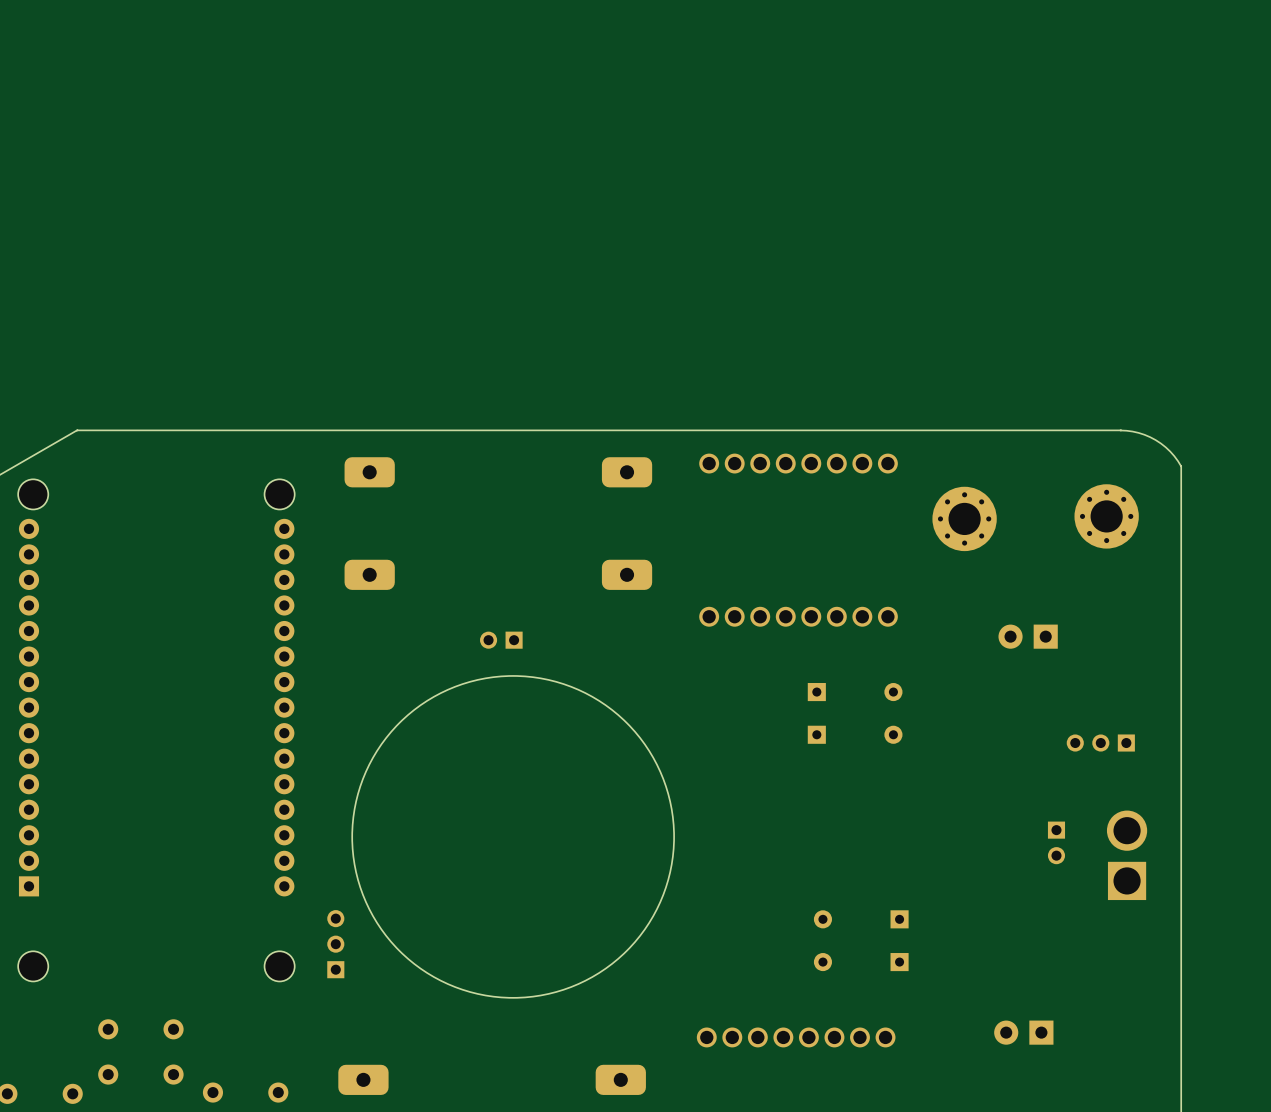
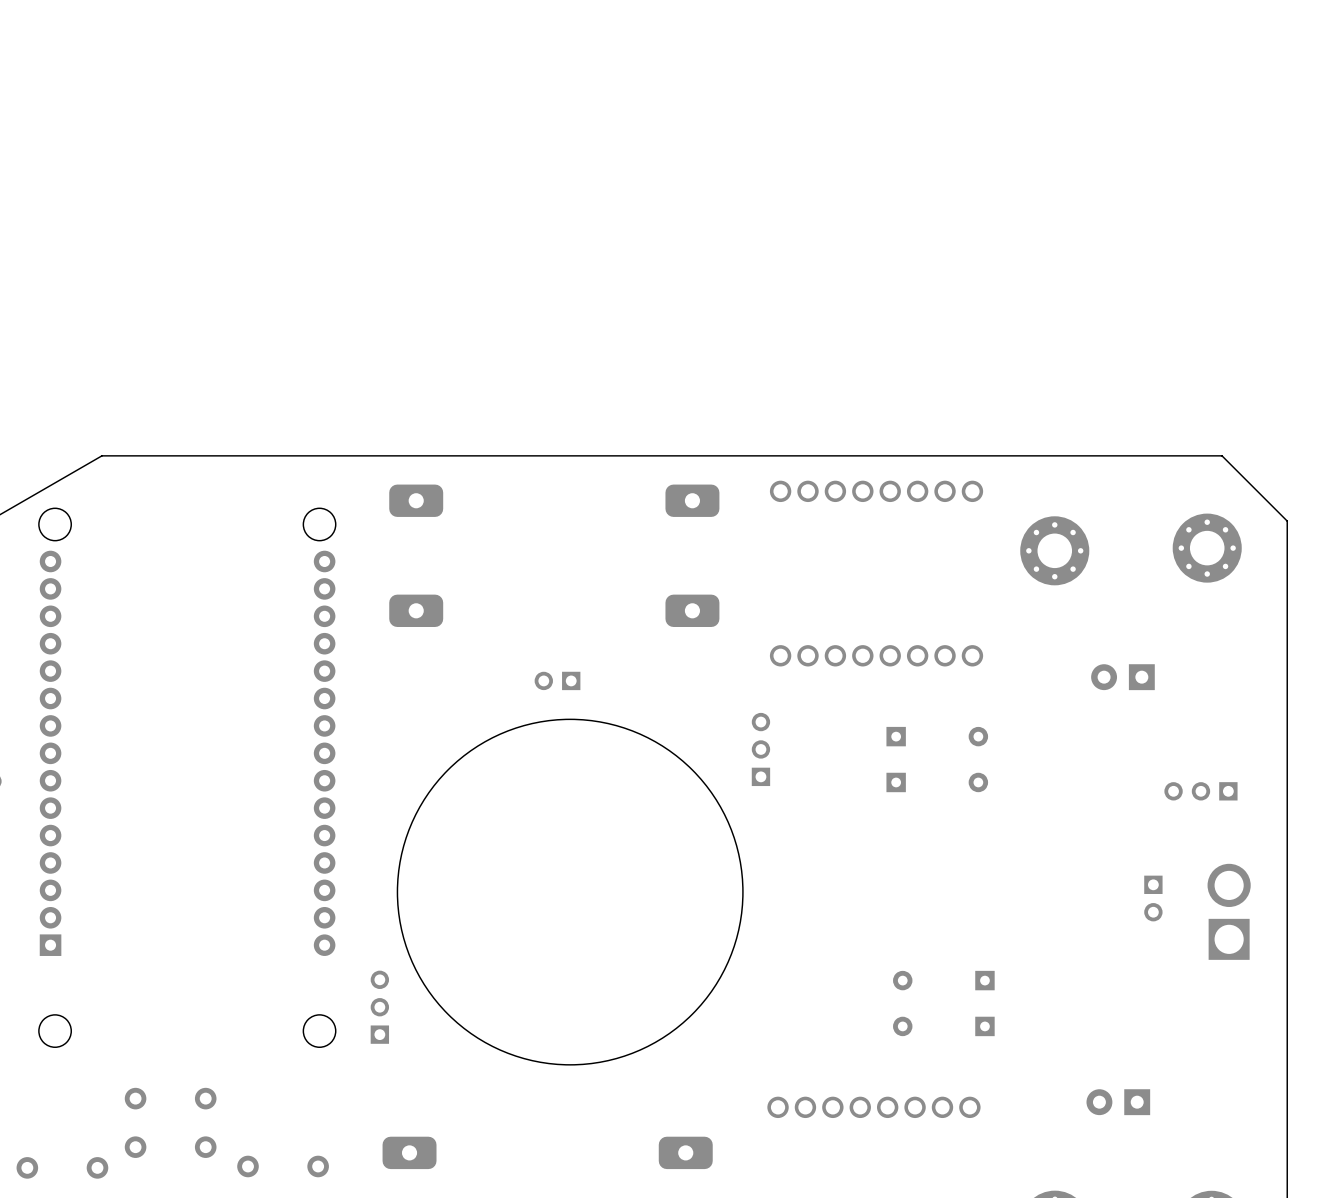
board edge: (1120, 430) (1138, 432) (1150, 437) (1170, 451) (1181, 466) (1181, 491) -> none
board edge: (1121, 430) (76, 430) -> (1287, 521) (1222, 455) (101, 455)
part: none -> (760, 749)

